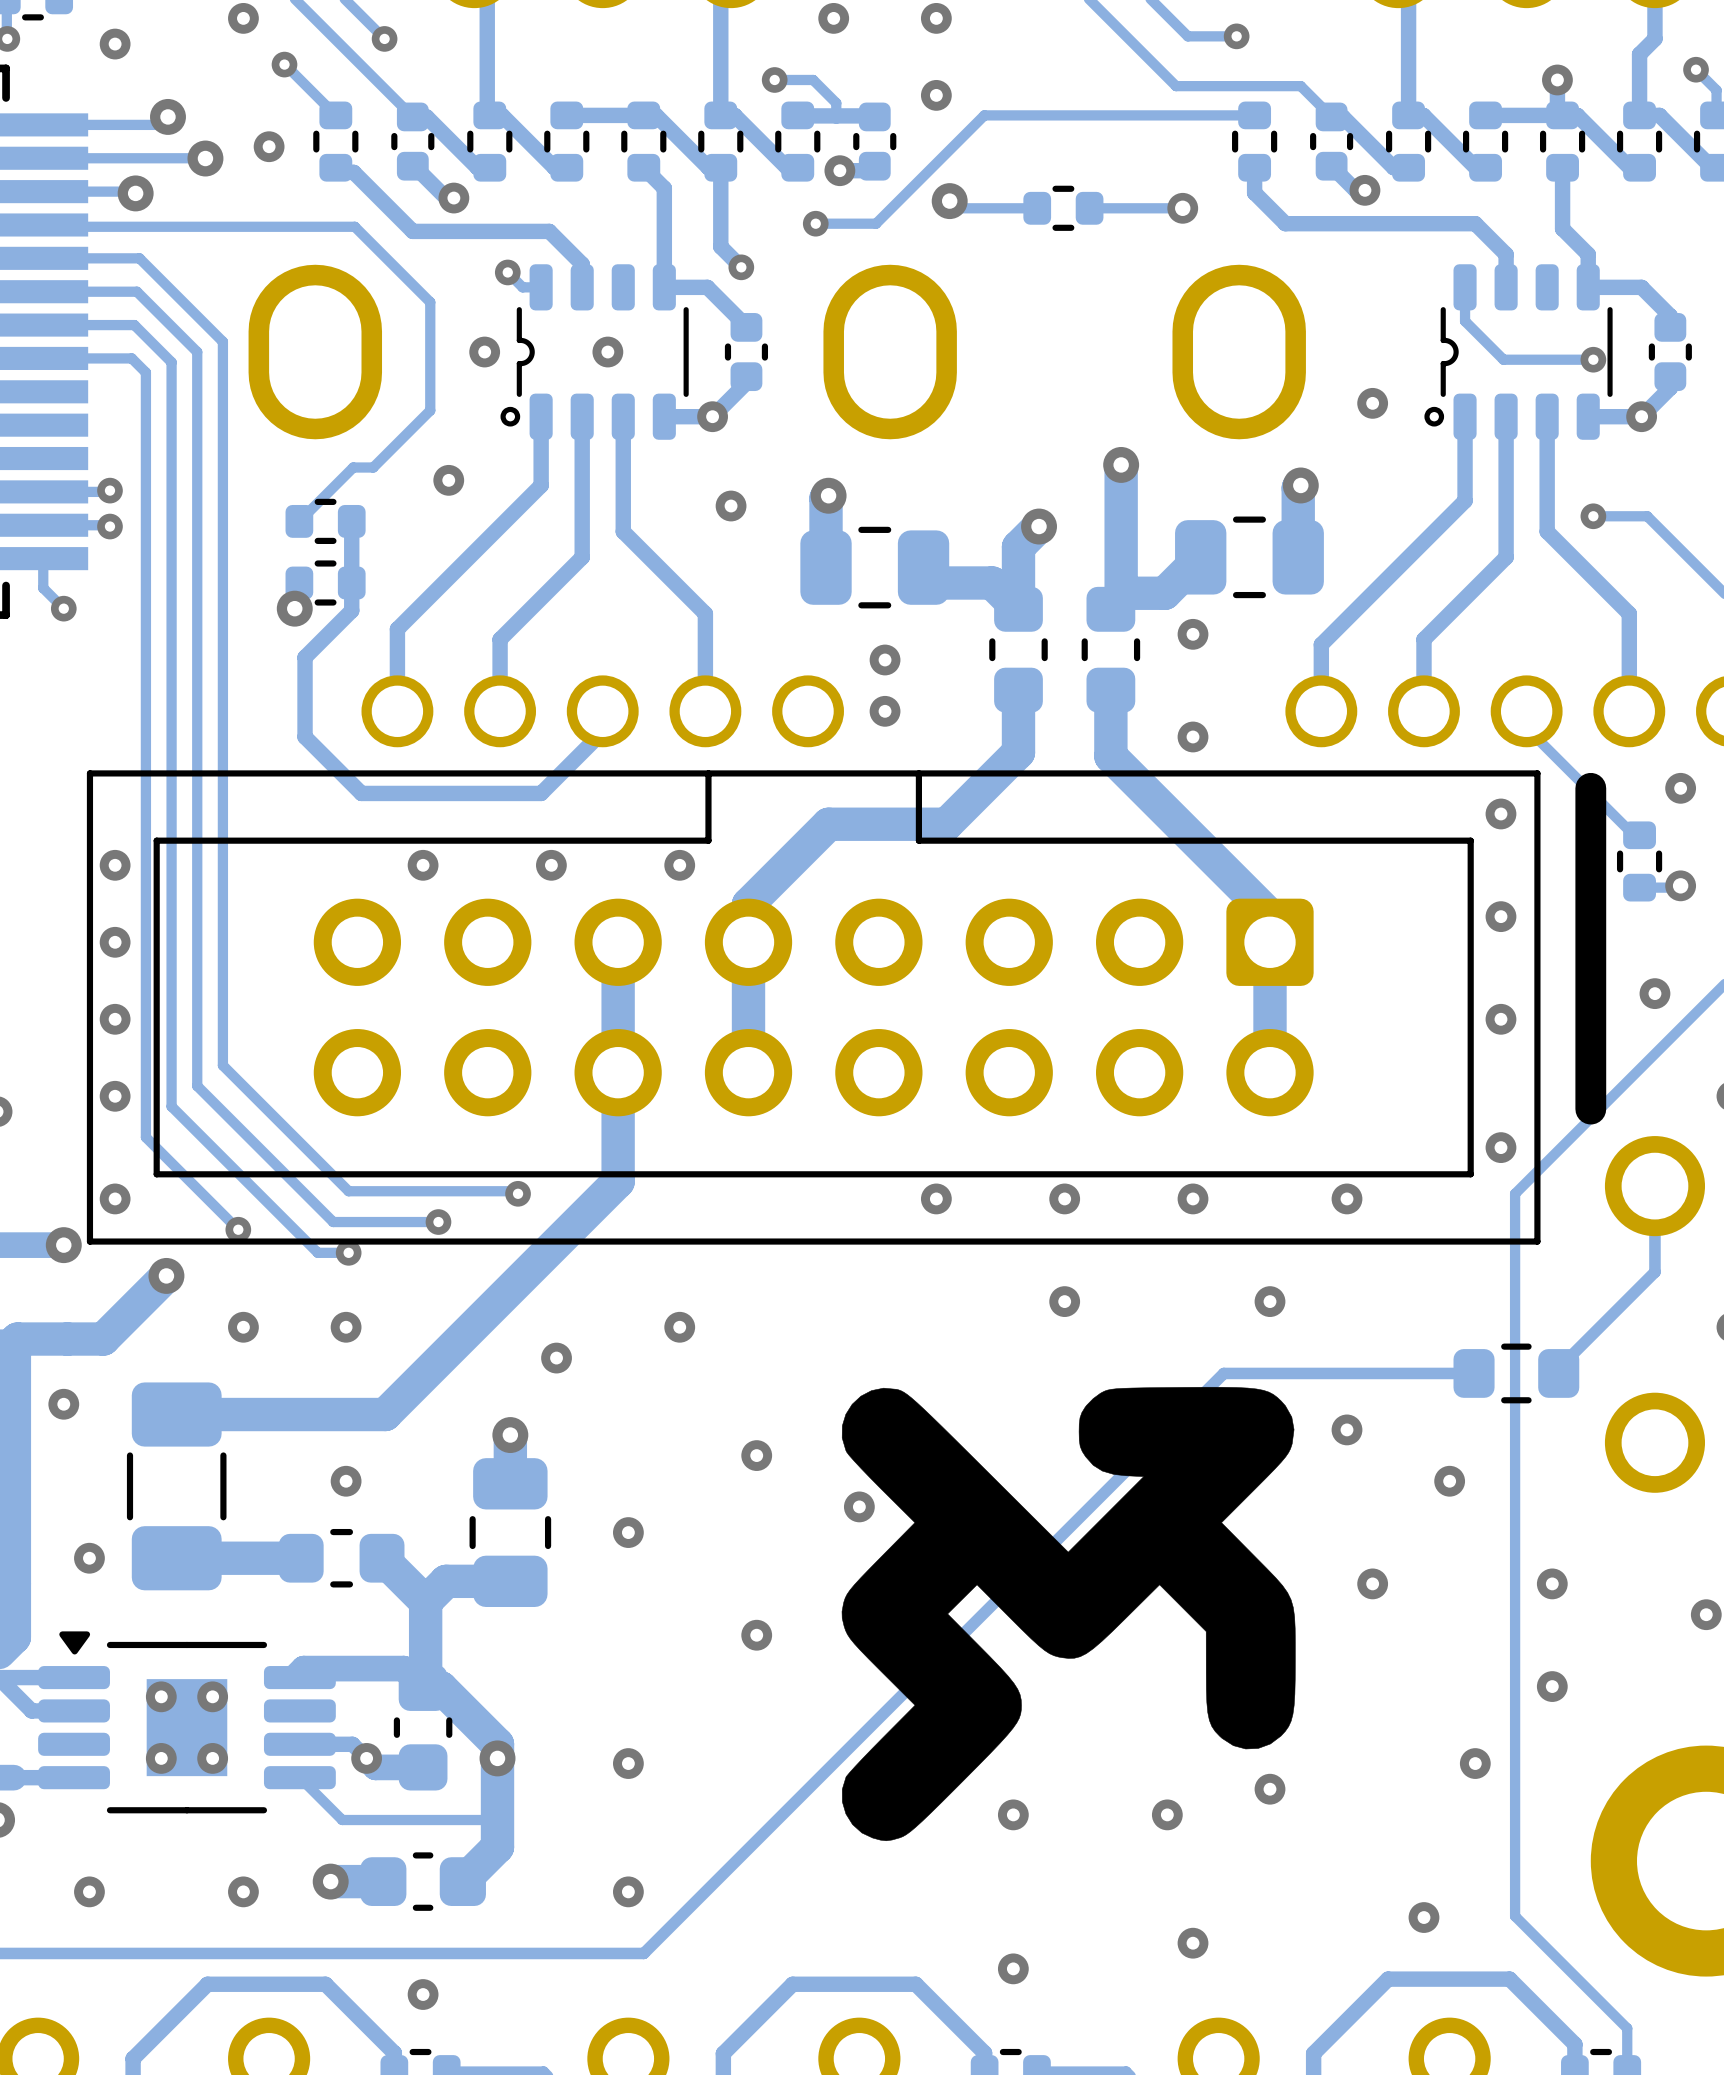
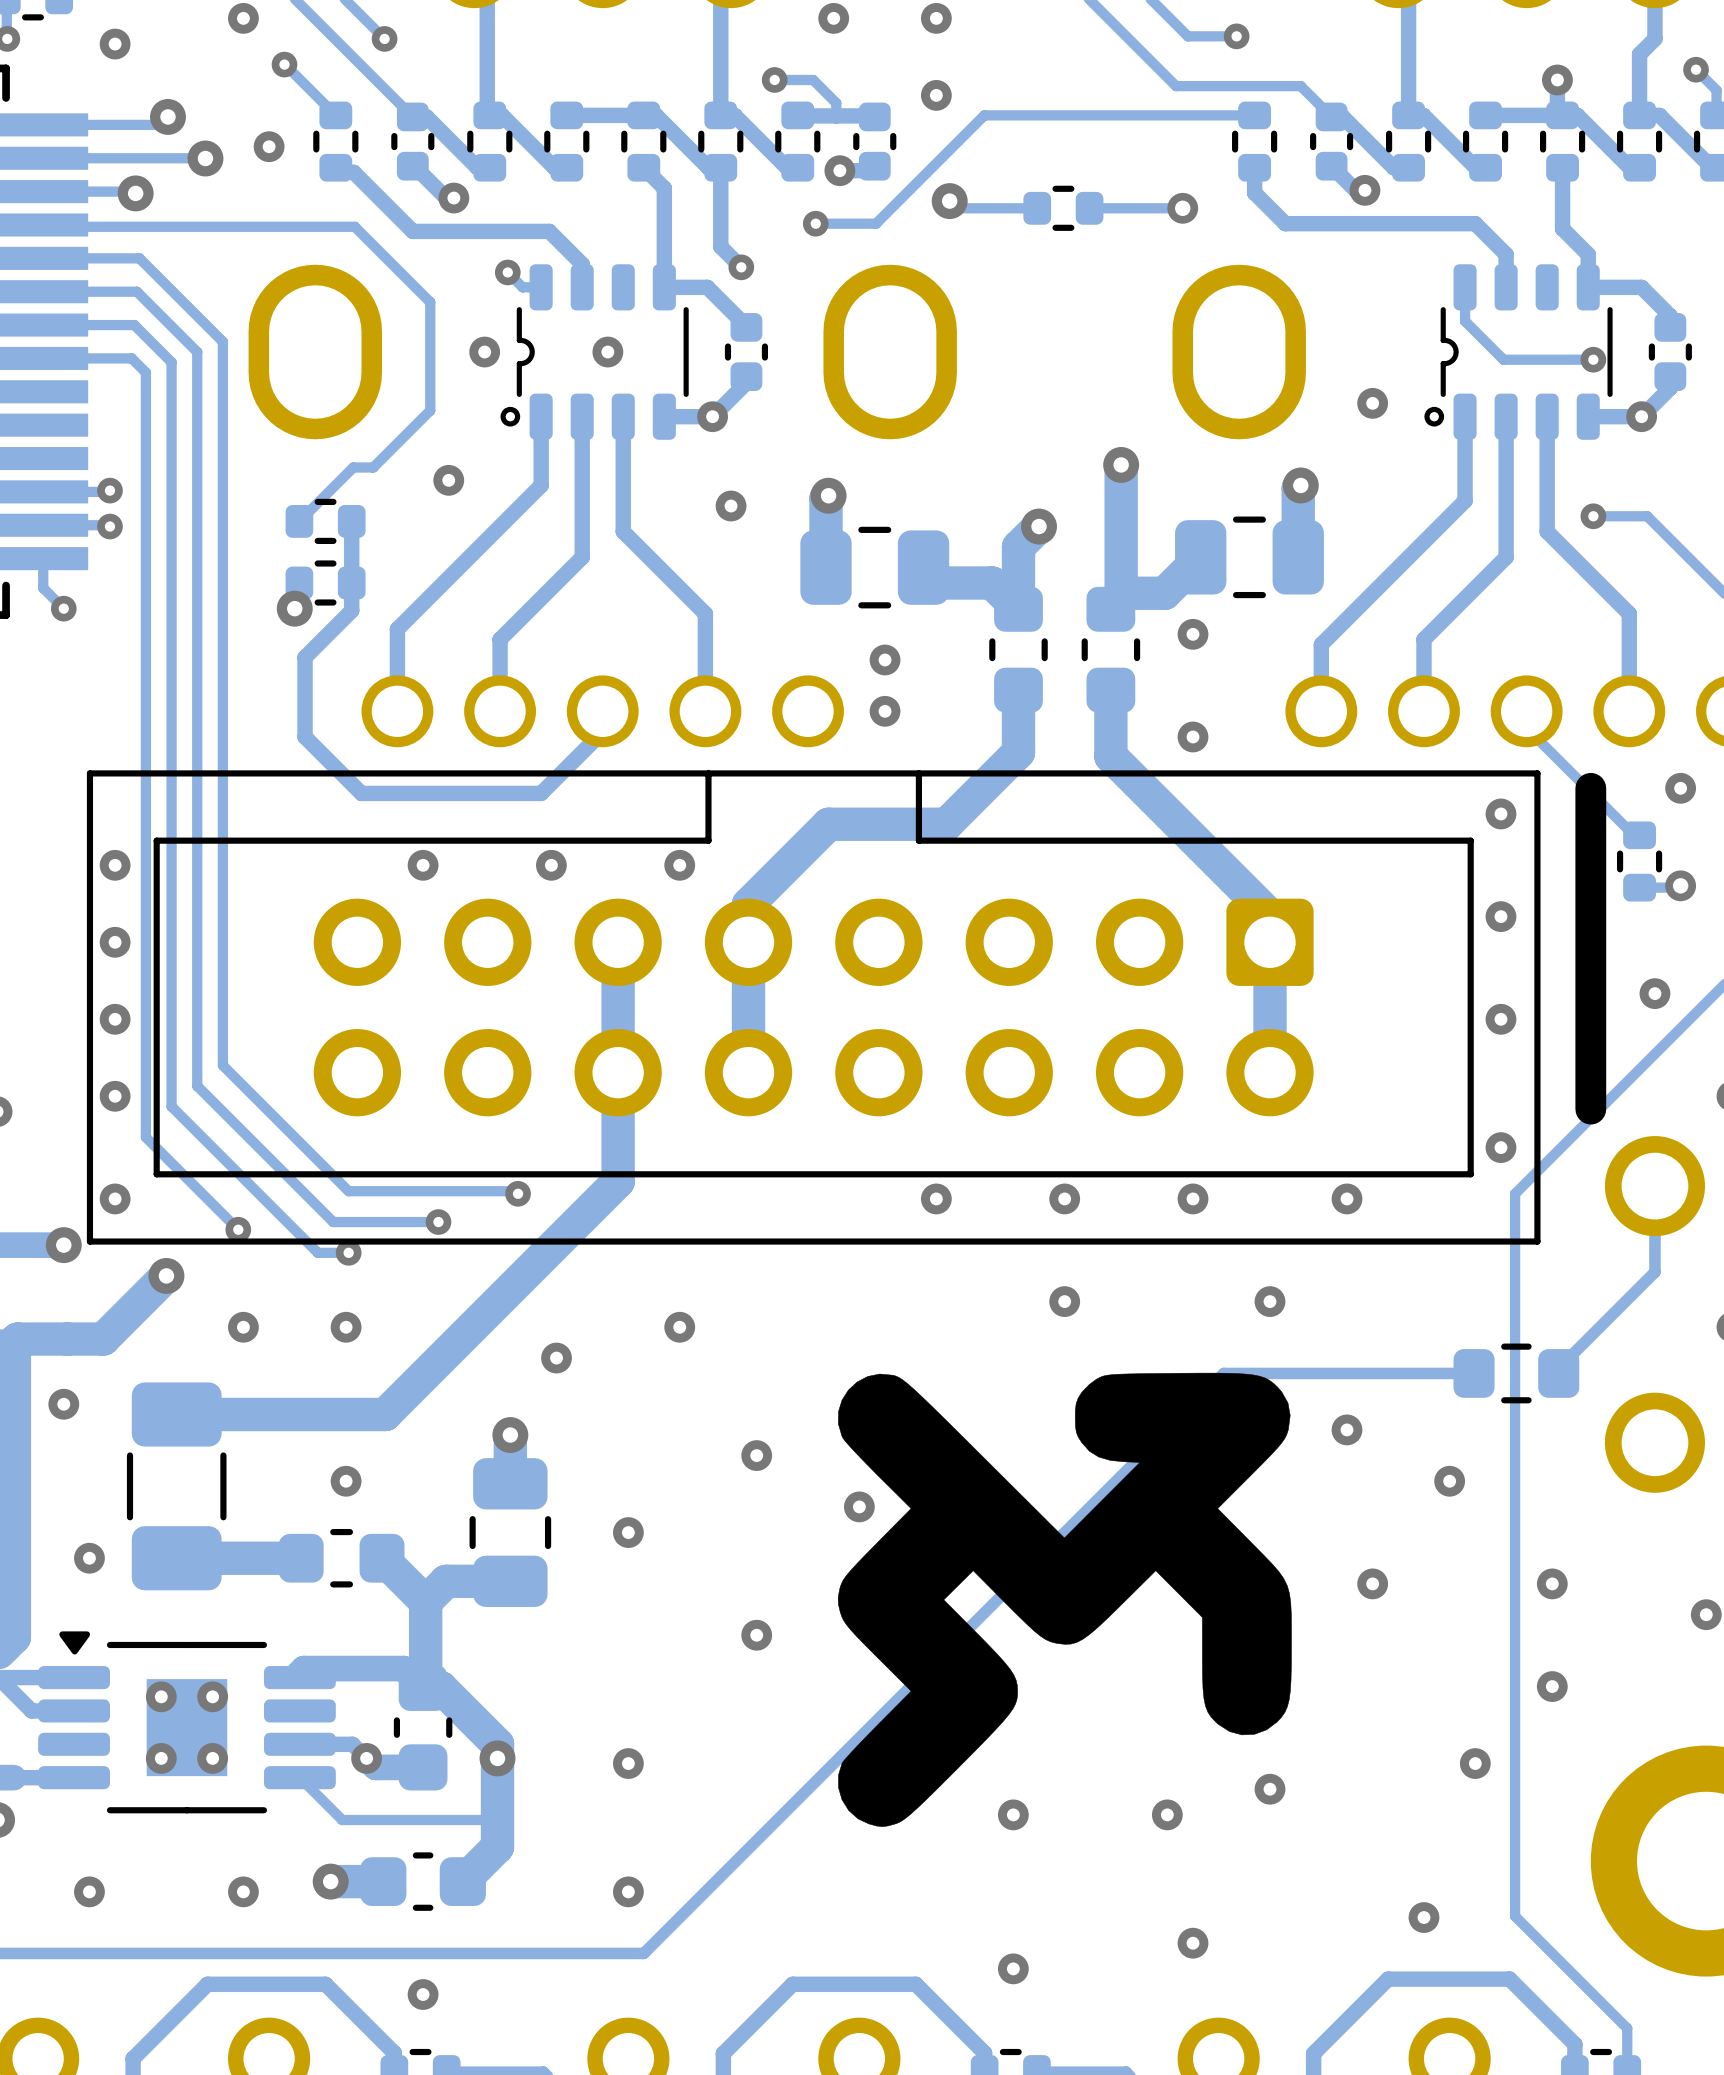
drawing position: (1068, 1614) -> (1064, 1599)

